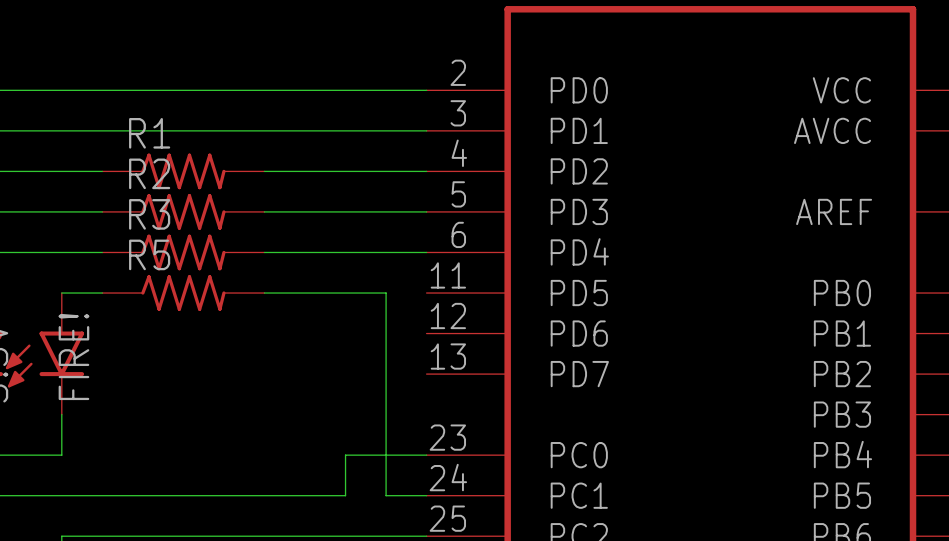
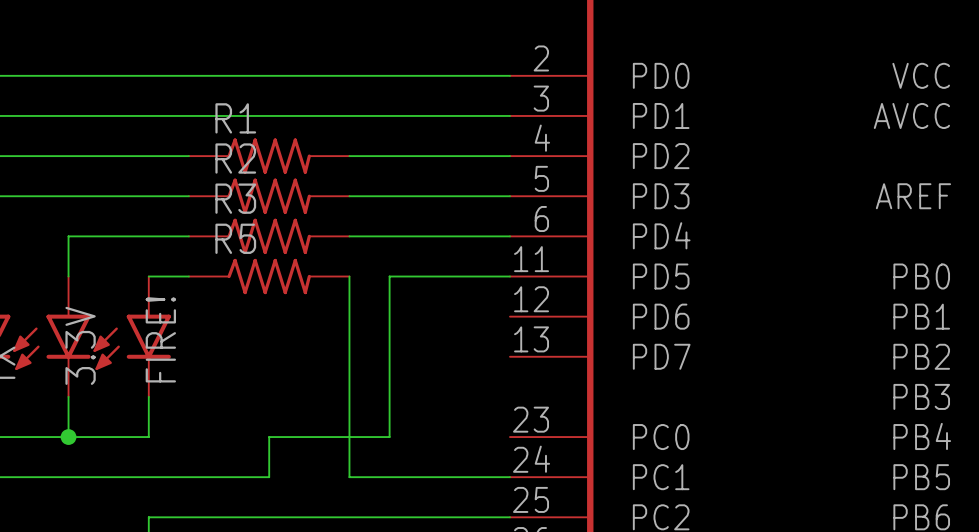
wire: (264, 293) (305, 293) -> (349, 276) (349, 477)
wire: (386, 293) (386, 495) -> (469, 276) (509, 276)
wire: (426, 455) (345, 455) (345, 495) -> (469, 477) (429, 477)
wire: (183, 495) (264, 495) -> (269, 477) (269, 437) (389, 437) (389, 276)

